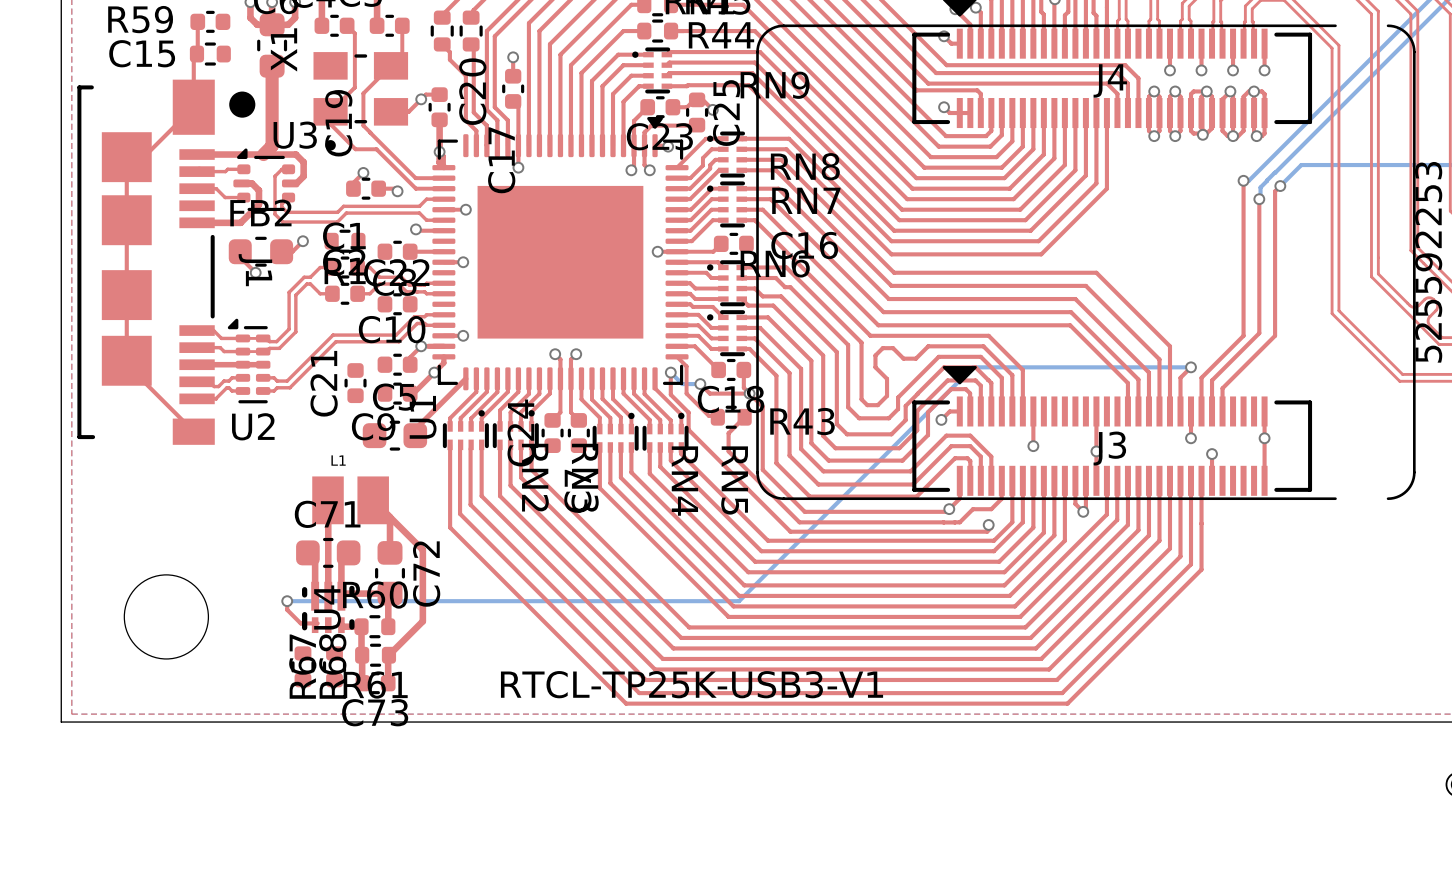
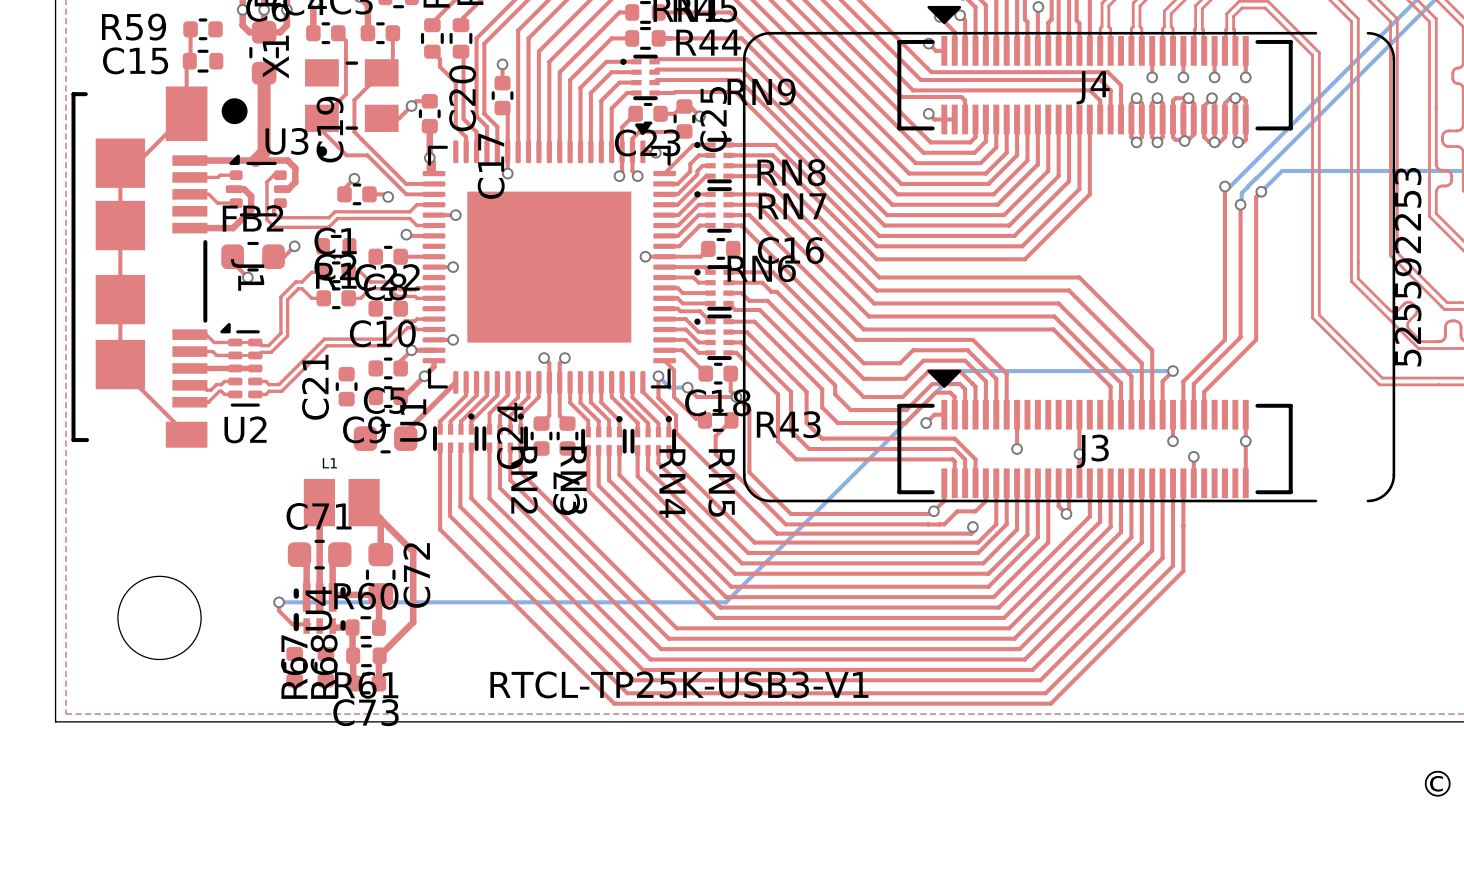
top track: (861, 342) (861, 399) (867, 405) (877, 405) (887, 395) (887, 378) (875, 367) (875, 355) (882, 348) (893, 348) (903, 358) (915, 358) -> (847, 346) (863, 363) (900, 362)
top track: (848, 345) (848, 407) (859, 418) (888, 418) (898, 409) (898, 397) (920, 375) -> (833, 348) (863, 378) (905, 378)
top track: (836, 352) (836, 424) (847, 434) (891, 434) (905, 420) (905, 405) (917, 393) -> (822, 355) (863, 397) (902, 397)
top track: (823, 355) (823, 435) (835, 448) (899, 448) (917, 430) (917, 410) (921, 406) -> (809, 359) (835, 385) (835, 394) (850, 410) (906, 410)
top track: (811, 360) (811, 443) (828, 460) (902, 460) (928, 435) (928, 412) -> (797, 364) (822, 389) (822, 407) (837, 423) (905, 423) (912, 415)
top track: (801, 368) (801, 449) (823, 471) (910, 471) (946, 435) -> (787, 372) (806, 391) (806, 423) (822, 438) (931, 438)
top track: (789, 373) (789, 455) (818, 484) (913, 484) (951, 446) -> (775, 376) (791, 391) (791, 430) (809, 449) (936, 449)
top track: (776, 375) (776, 463) (809, 496) (916, 496) (955, 458) (967, 458) (970, 461) -> (762, 379) (778, 394) (778, 441) (796, 459) (952, 459) (954, 463)

